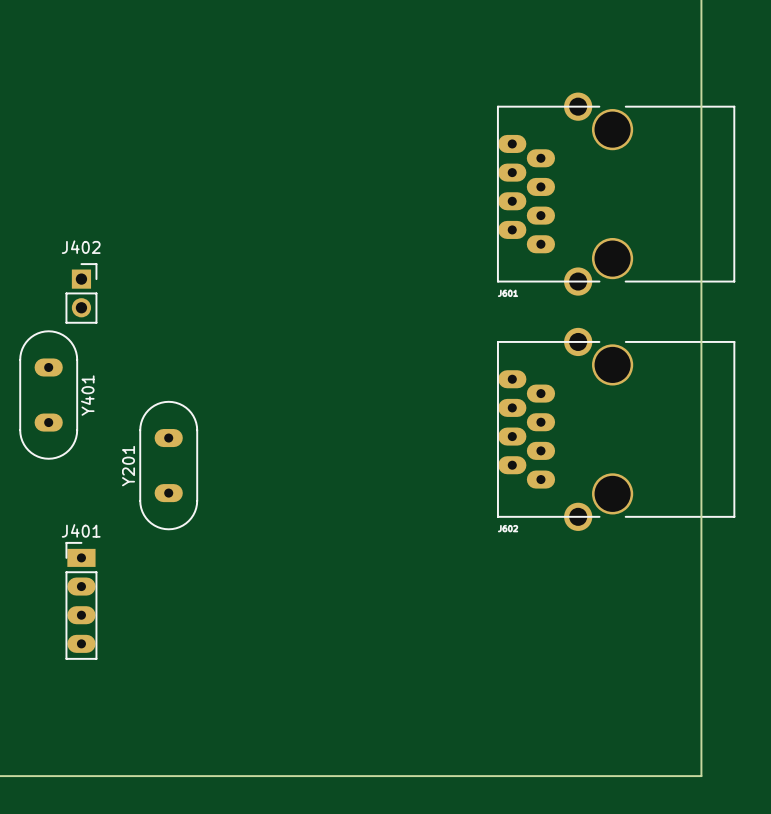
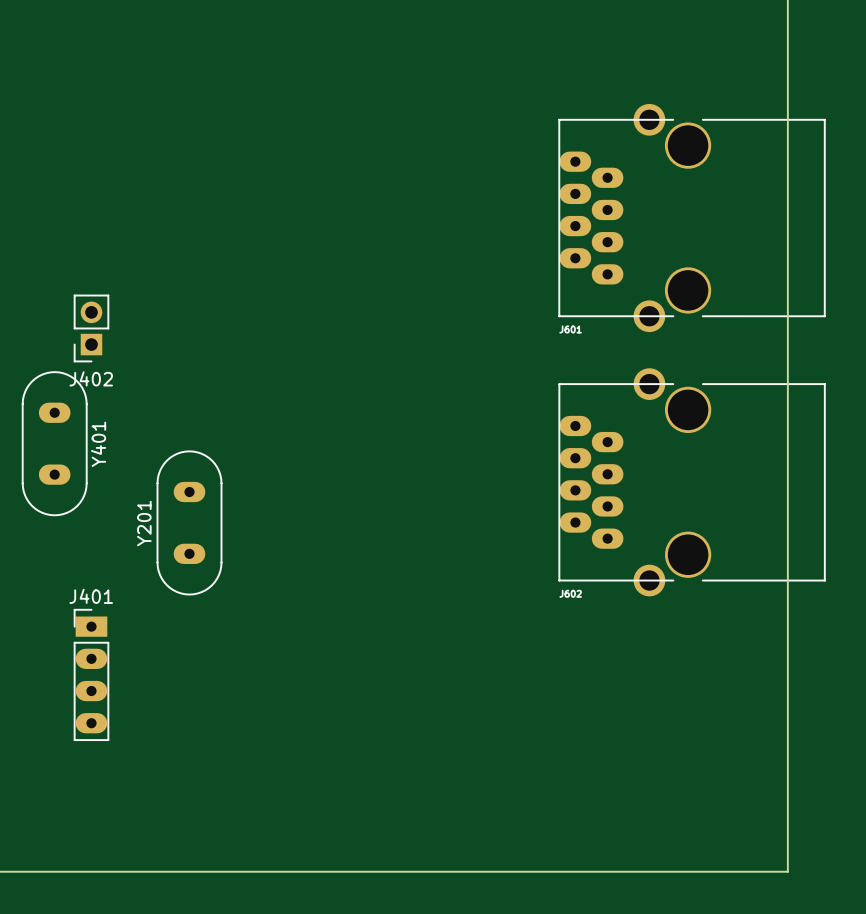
J402 rotation: 0° (81, 293) -> 180° (91, 328)

